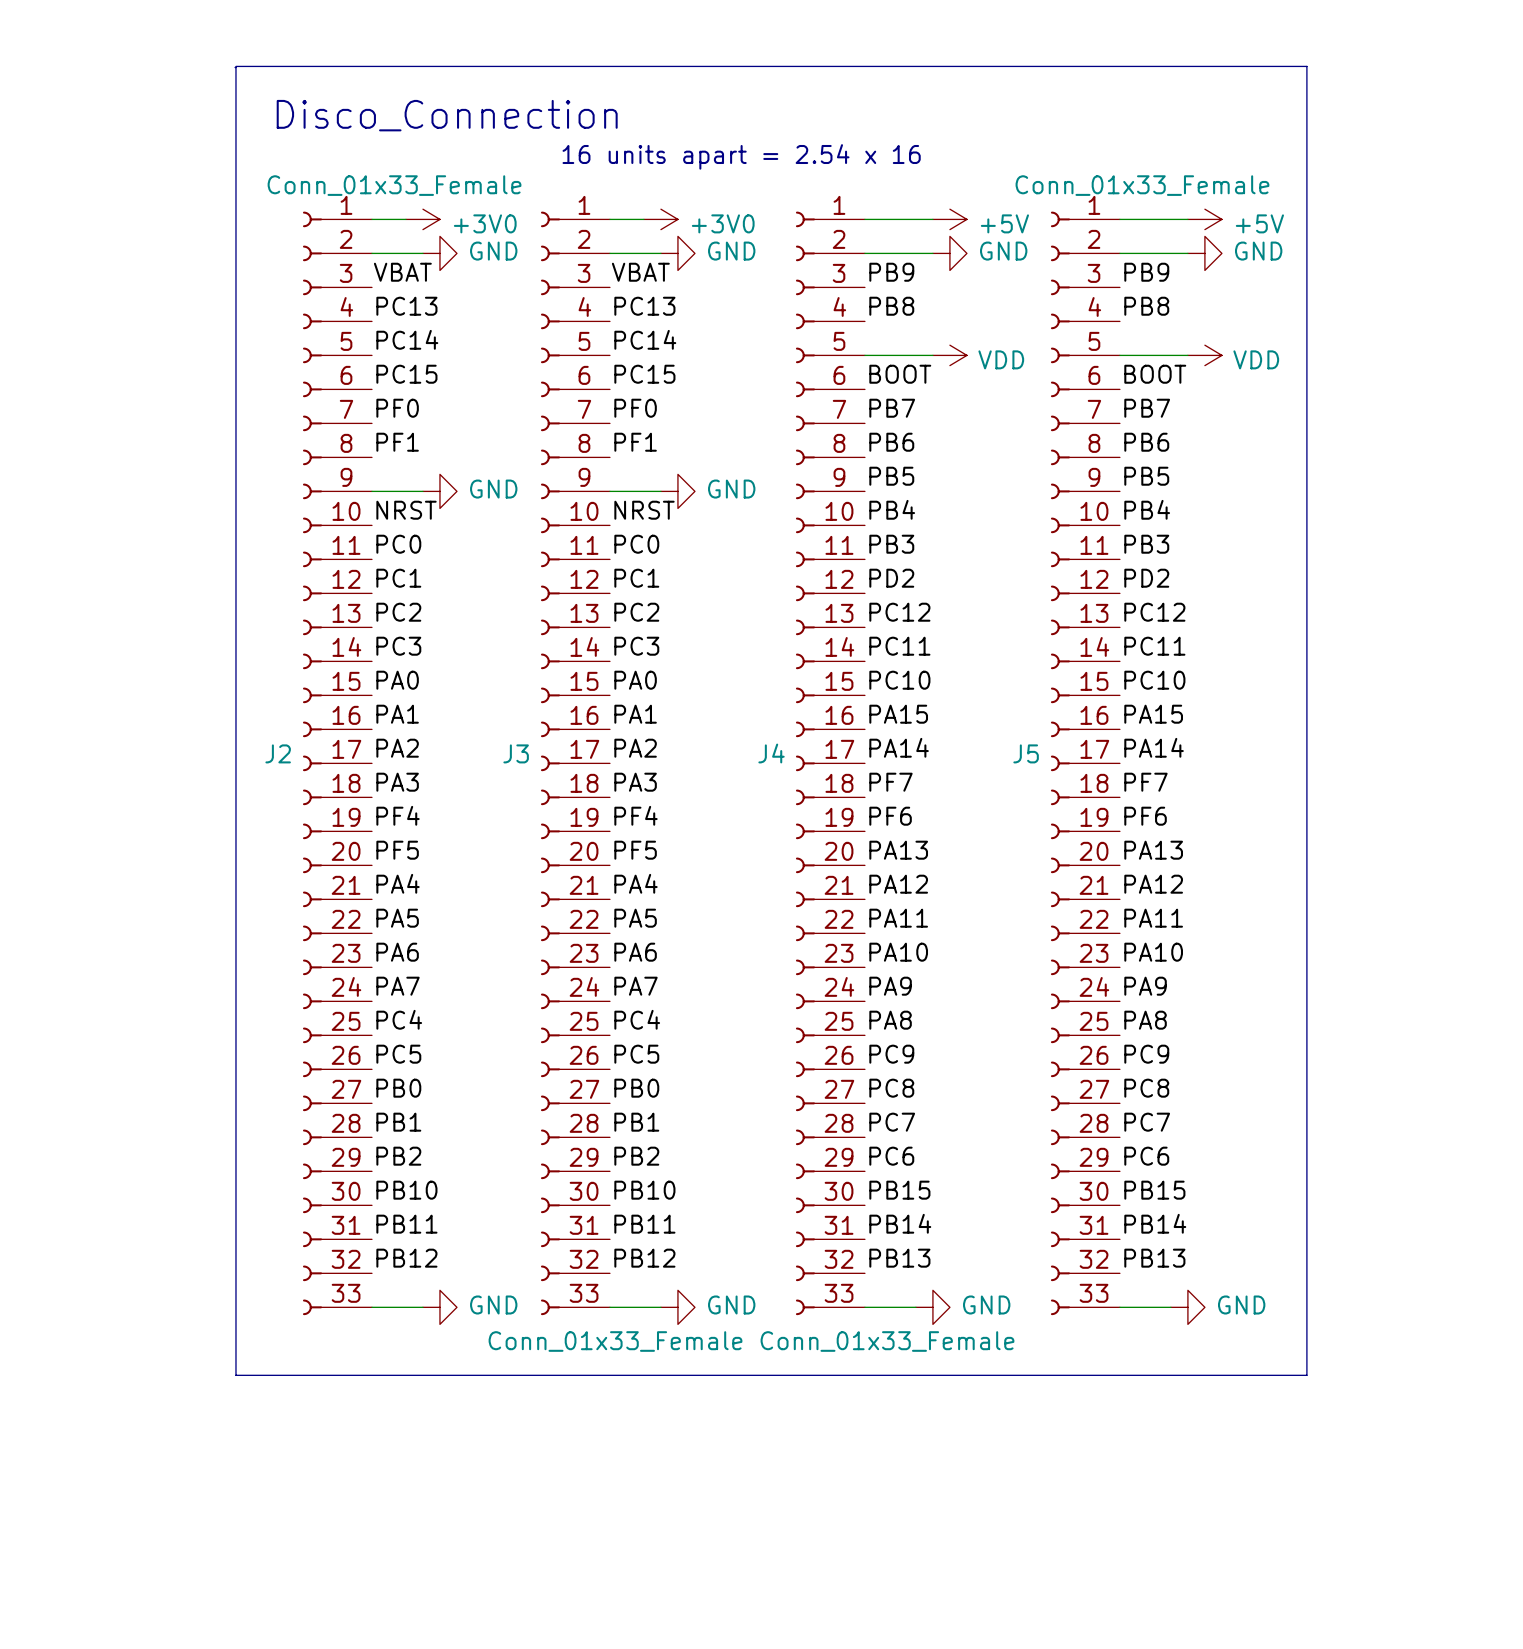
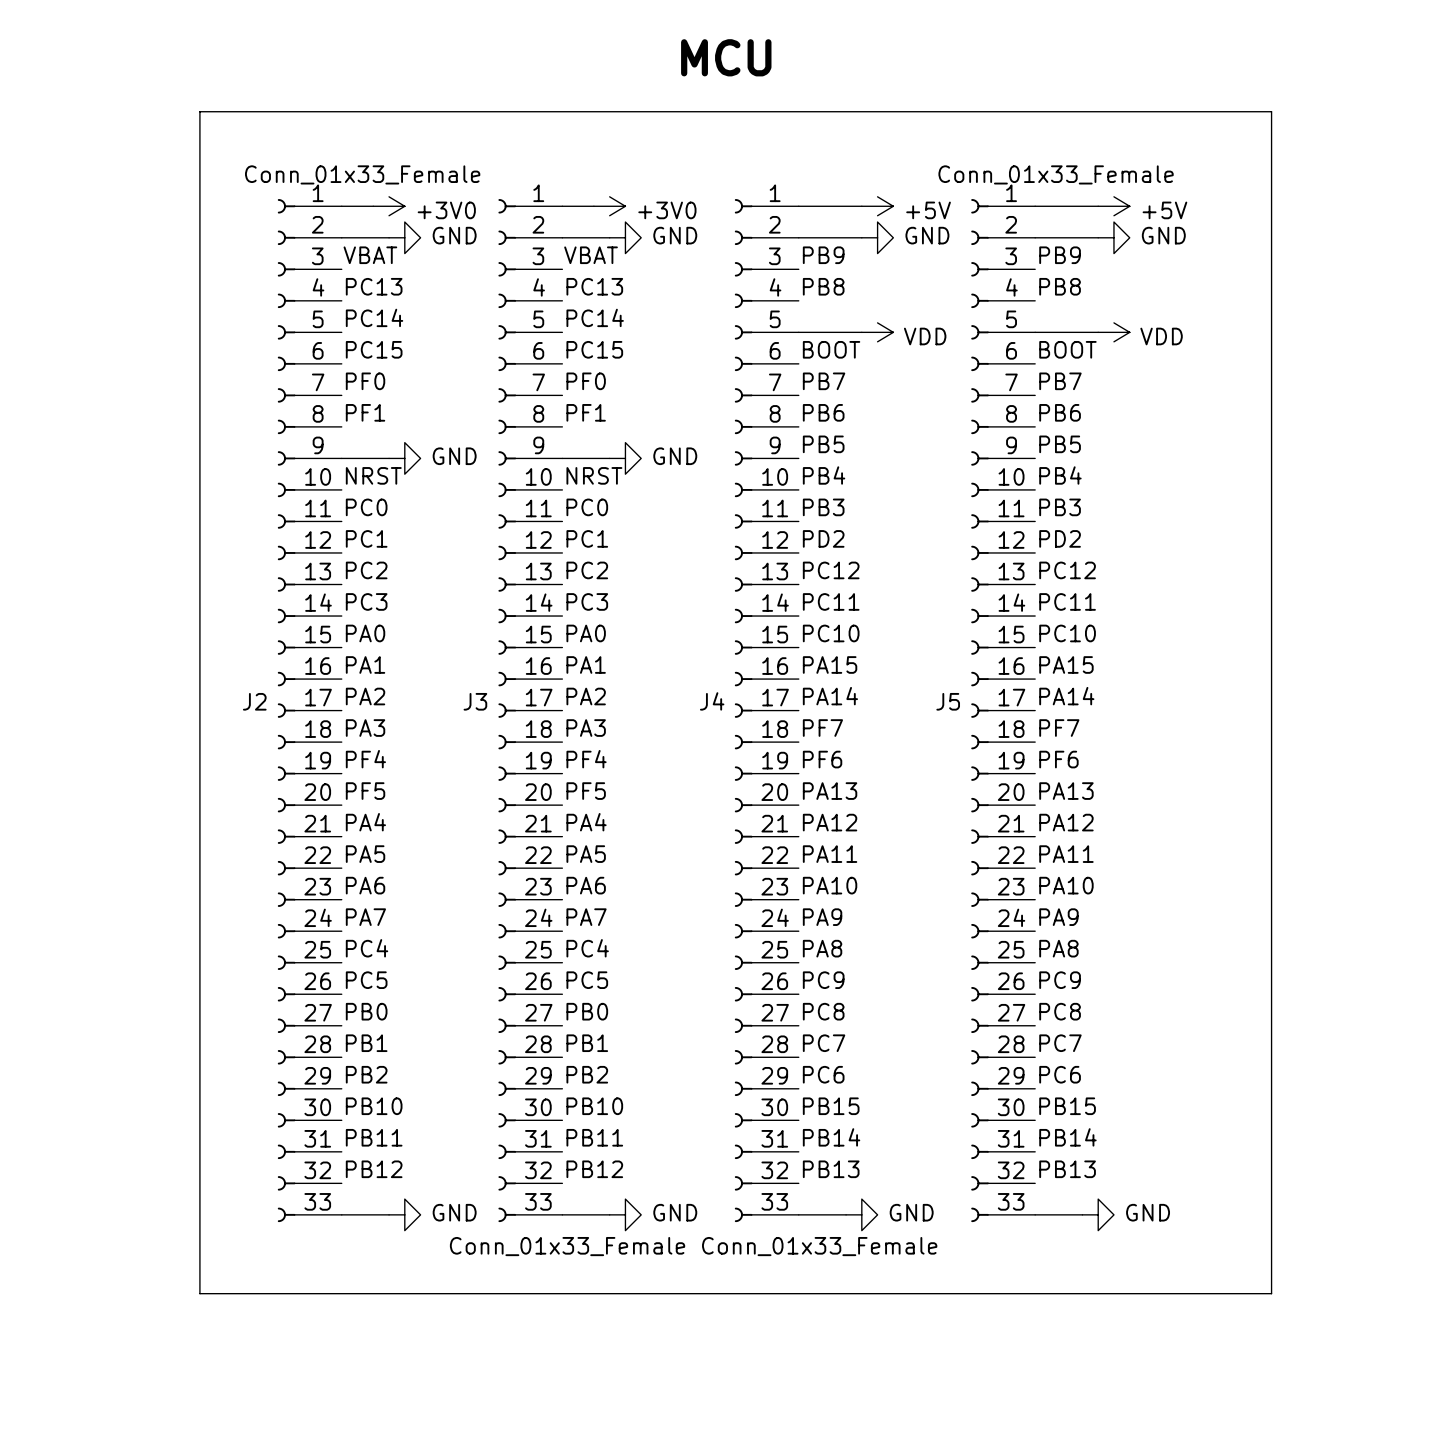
text: none -> MCU (726, 57)
line: (235, 66) (1306, 66) (1306, 1375) (235, 1375) (235, 67) -> none
text: Disco_Connection (447, 115) -> none
line: none -> (199, 111) (1271, 111) (1271, 1293) (199, 1293) (199, 111)
text: 16 units apart = 2.54 x 16 (741, 156) -> none

